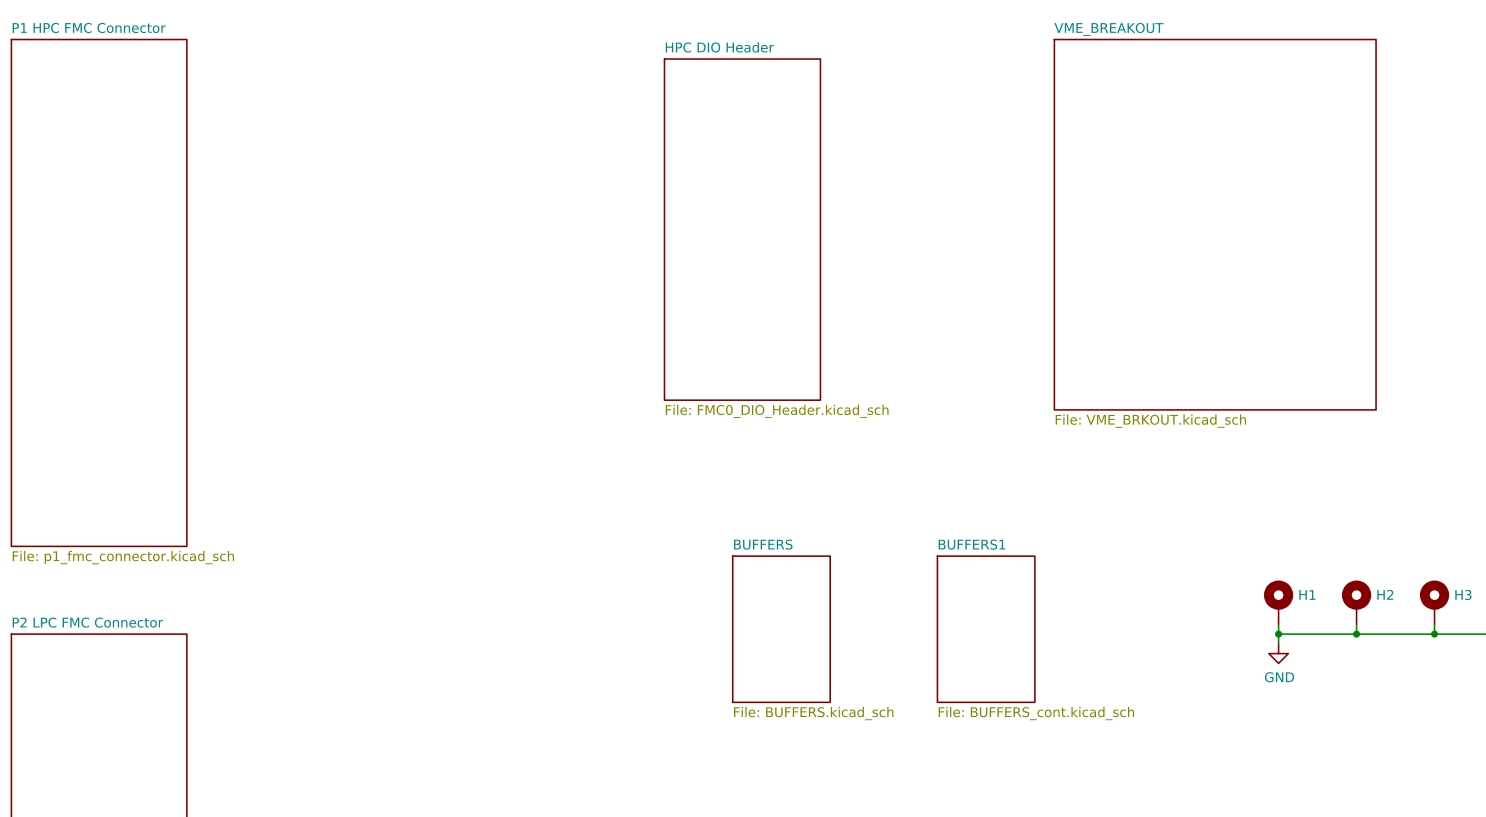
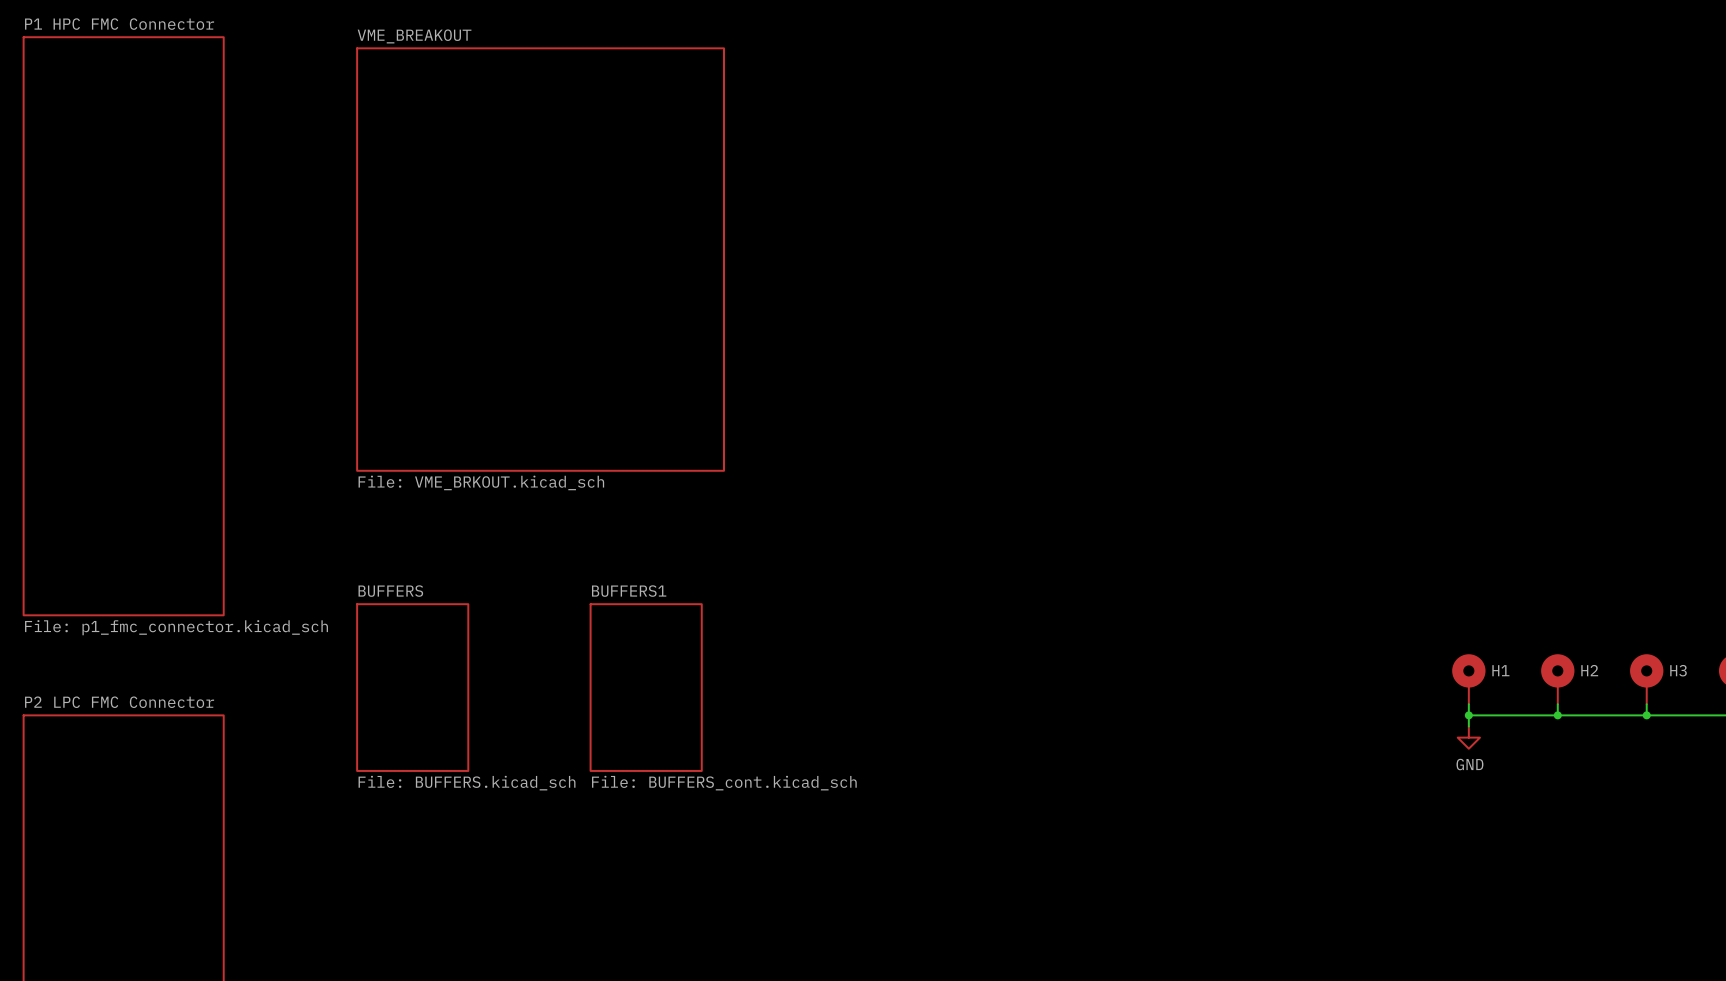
sheet VME_BREAKOUT: File: VME_BRKOUT.kicad_sch (1215, 224) -> none
sheet HPC DIO Header: File: FMC0_DIO_Header.kicad_sch (742, 229) -> none
sheet VME_BREAKOUT: none -> File: VME_BRKOUT.kicad_sch (540, 259)
sheet BUFFERS: none -> File: BUFFERS.kicad_sch (412, 687)
sheet BUFFERS: File: BUFFERS.kicad_sch (781, 629) -> none
sheet BUFFERS1 position: (986, 629) -> (646, 687)

